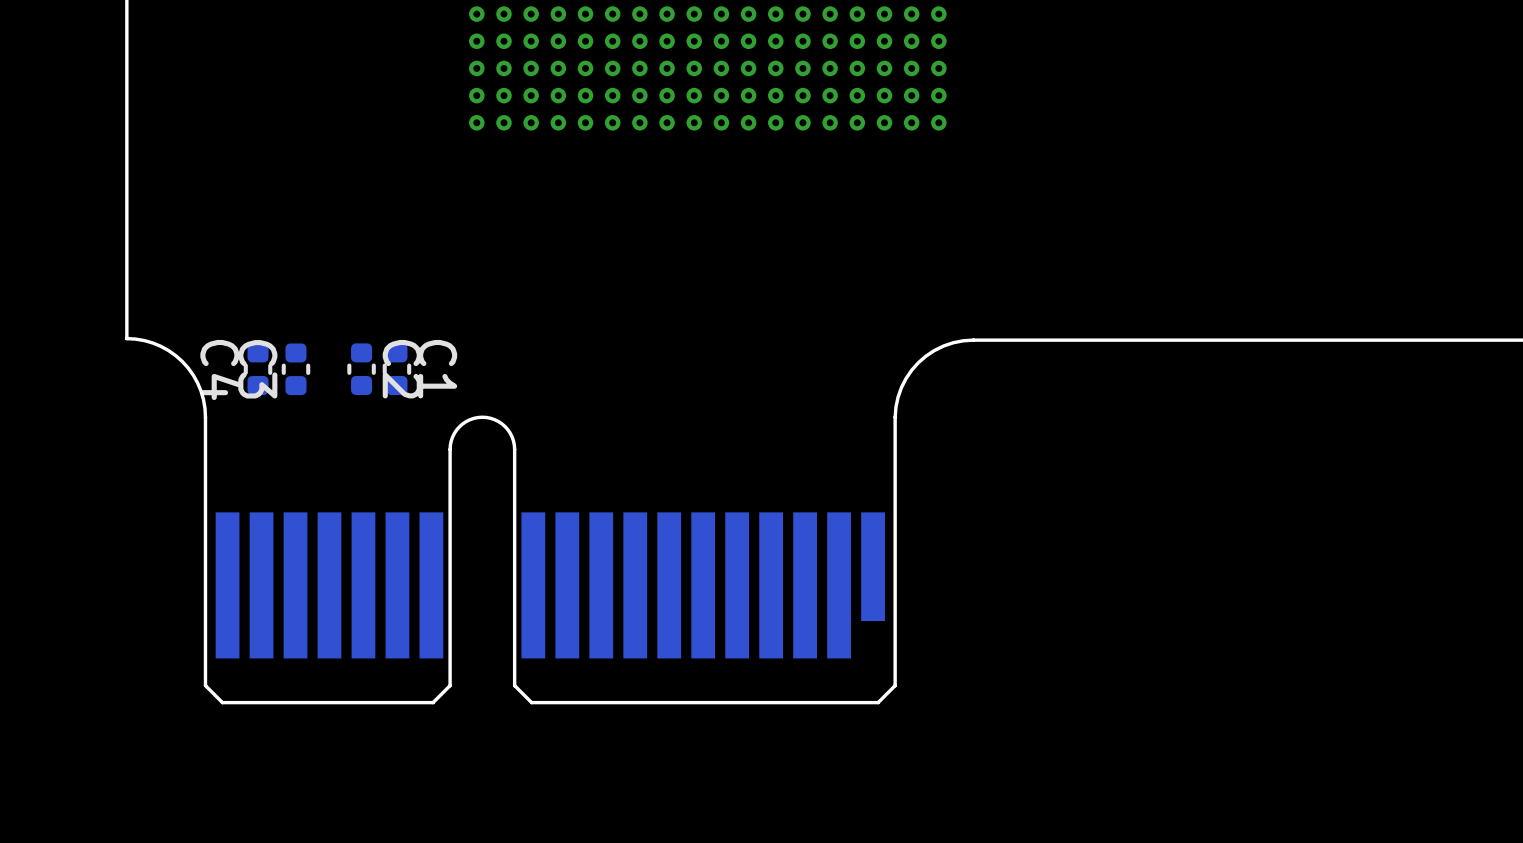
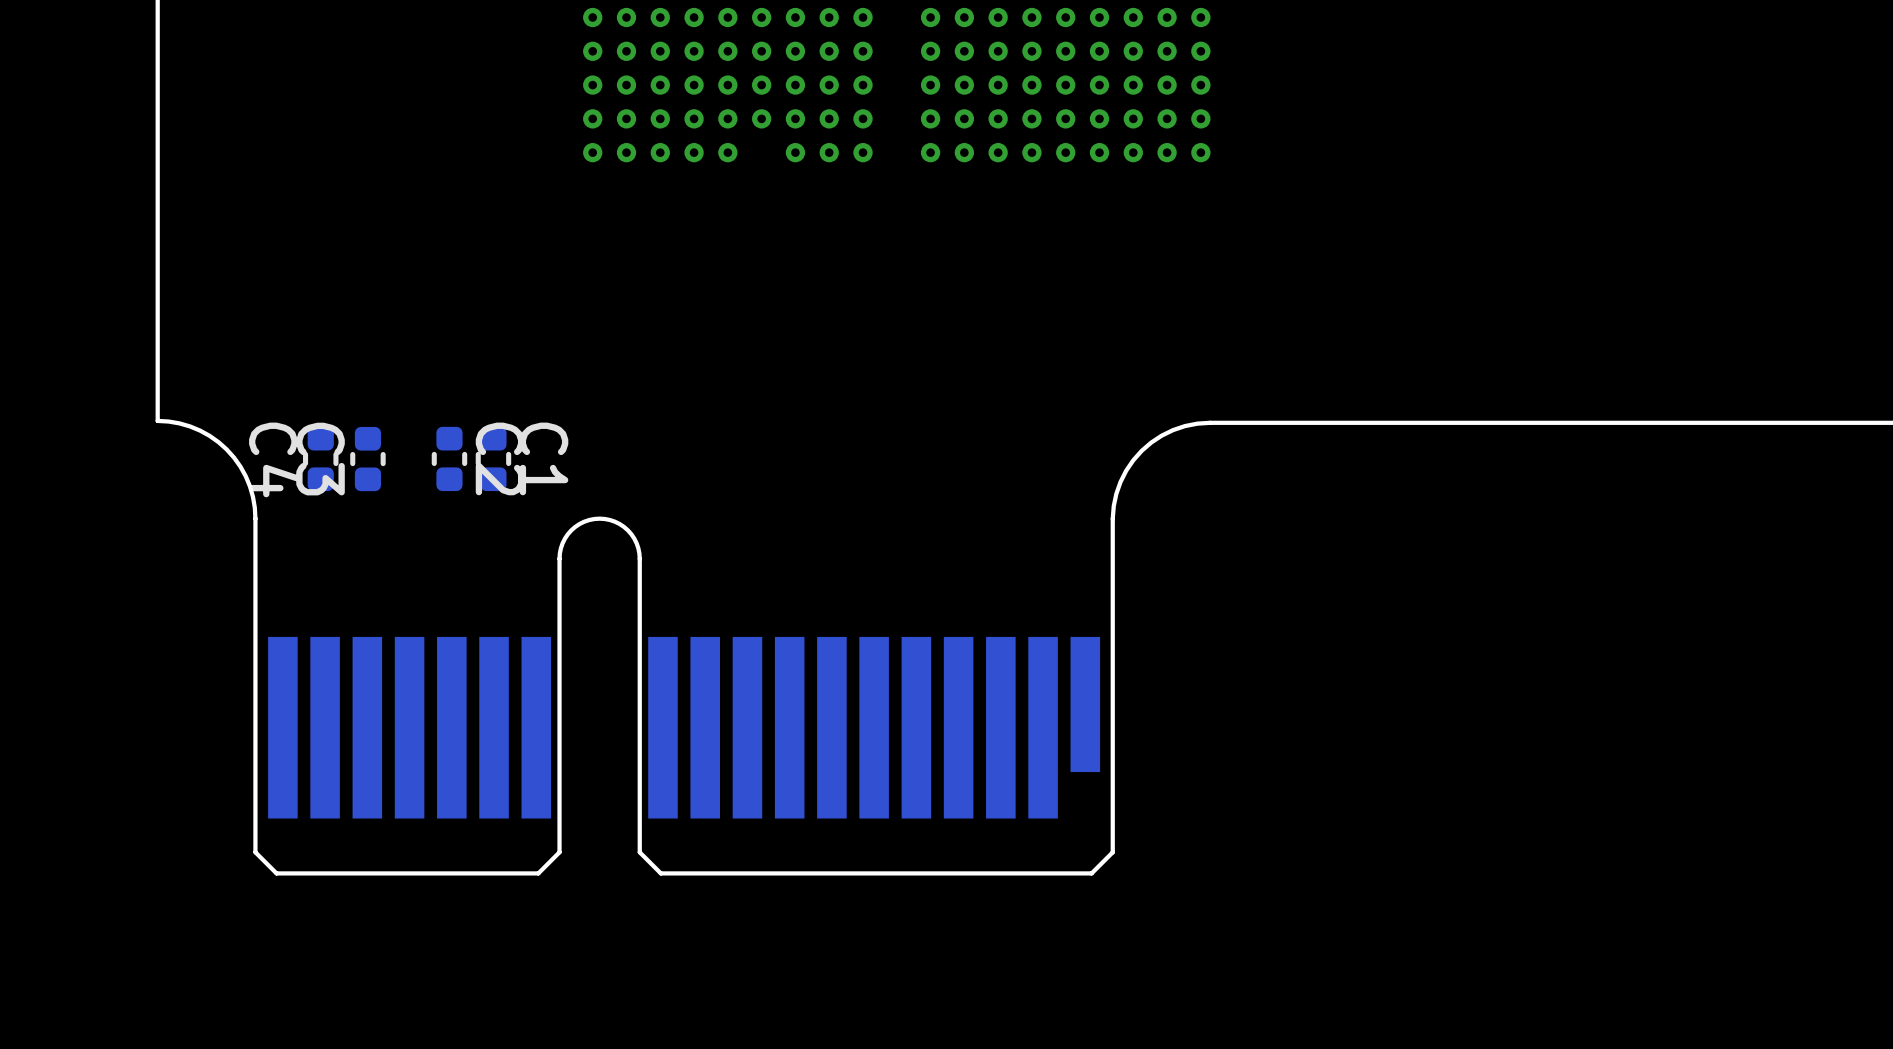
via: (721, 14) -> none
via: none -> (1200, 17)
via: (721, 41) -> none
via: none -> (1200, 51)
via: (721, 68) -> none
via: none -> (1200, 85)
via: (721, 95) -> none
via: none -> (1200, 118)
via: (612, 122) -> none
via: (721, 122) -> none
via: none -> (1200, 152)

